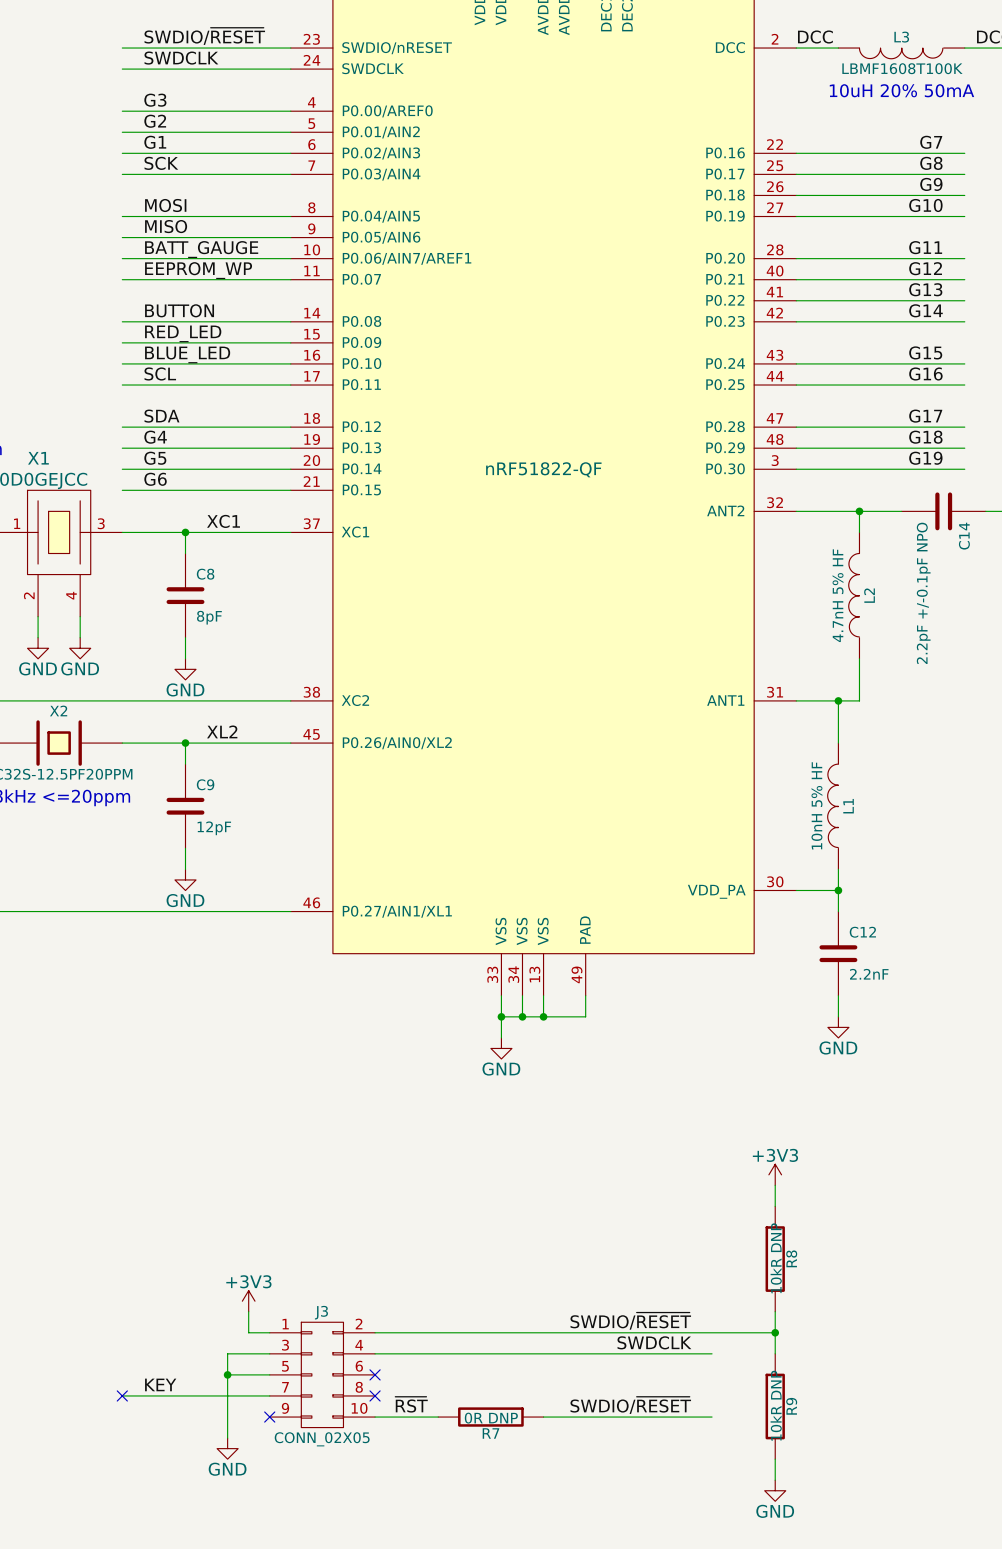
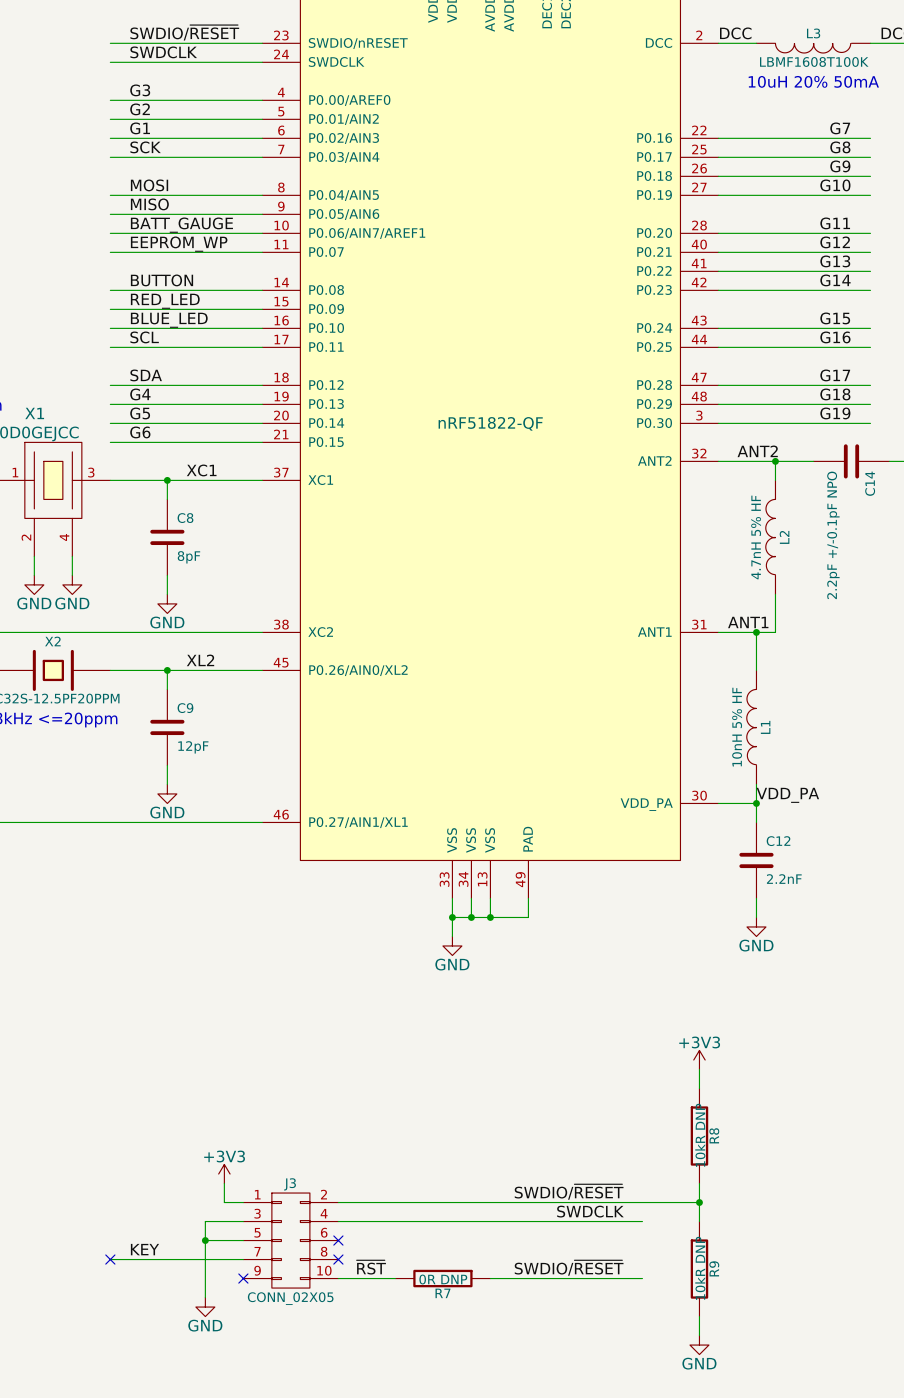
label: none -> ANT2 (757, 451)
label: none -> ANT1 (748, 622)
label: none -> VDD_PA (787, 795)

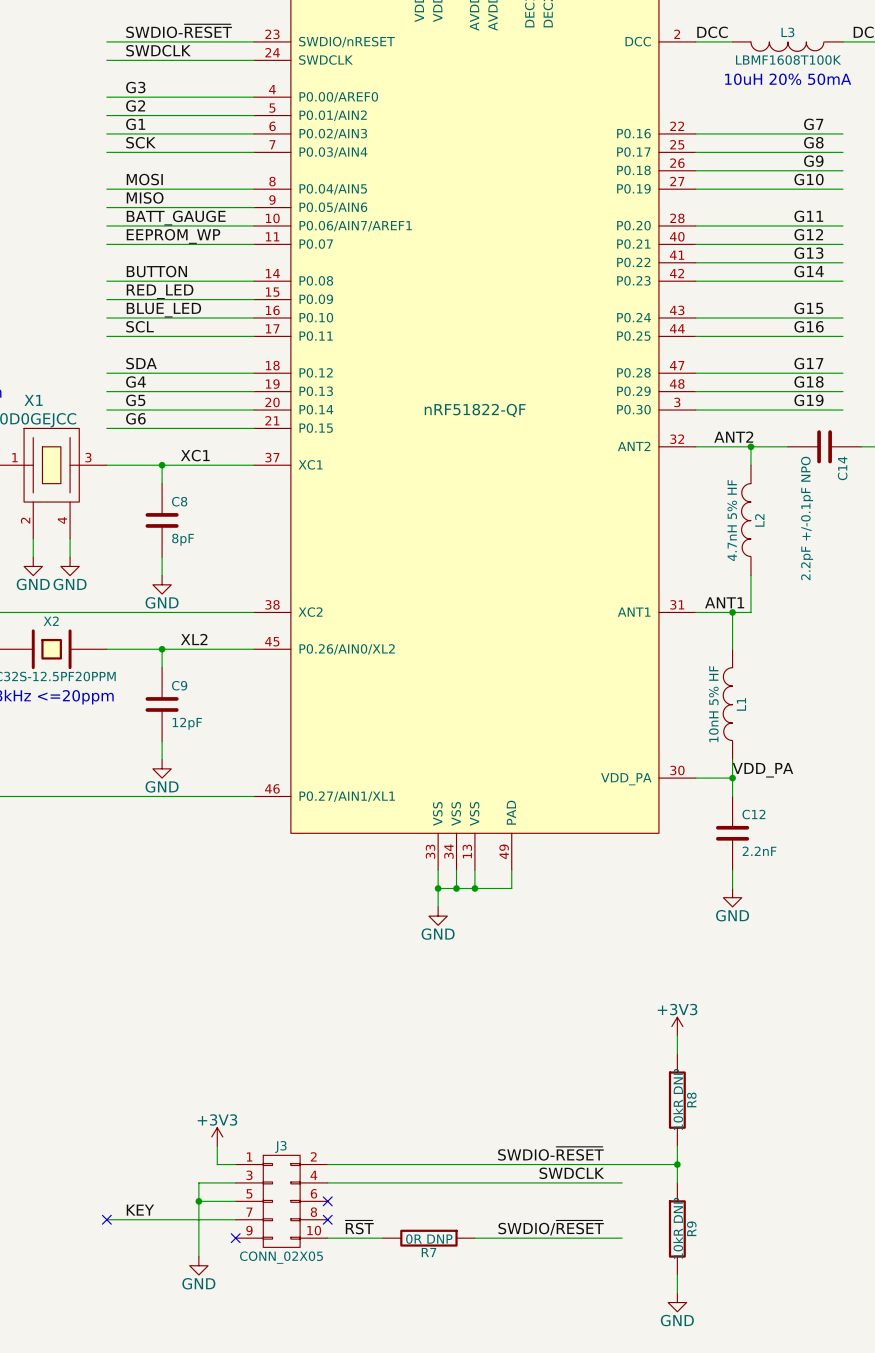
label: SWDIO/~{RESET} (184, 32) -> SWDIO-~{RESET} (179, 31)
label: SWDIO/~{RESET} (569, 1191) -> SWDIO-~{RESET} (550, 1153)

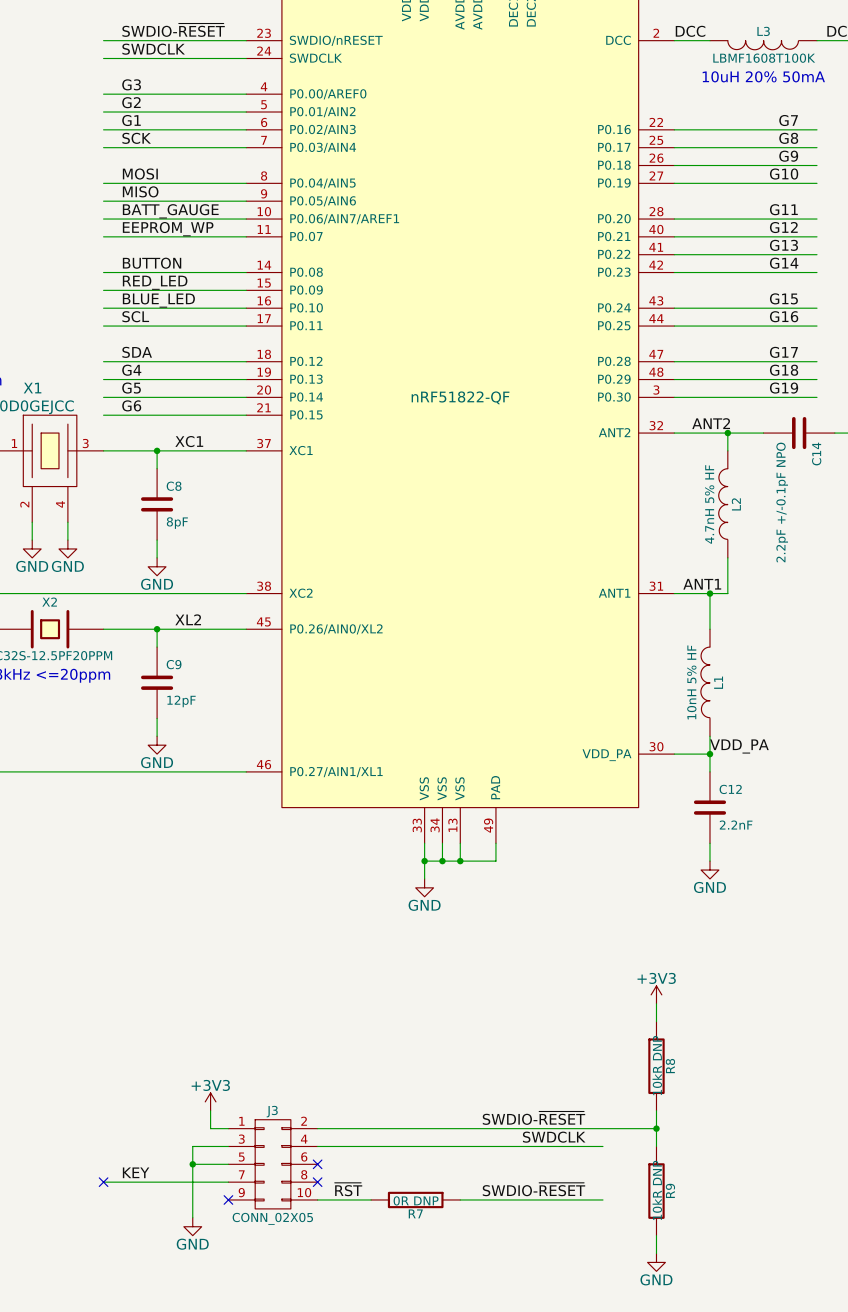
label: SWDIO/~{RESET} (551, 1227) -> SWDIO-~{RESET} (533, 1189)

